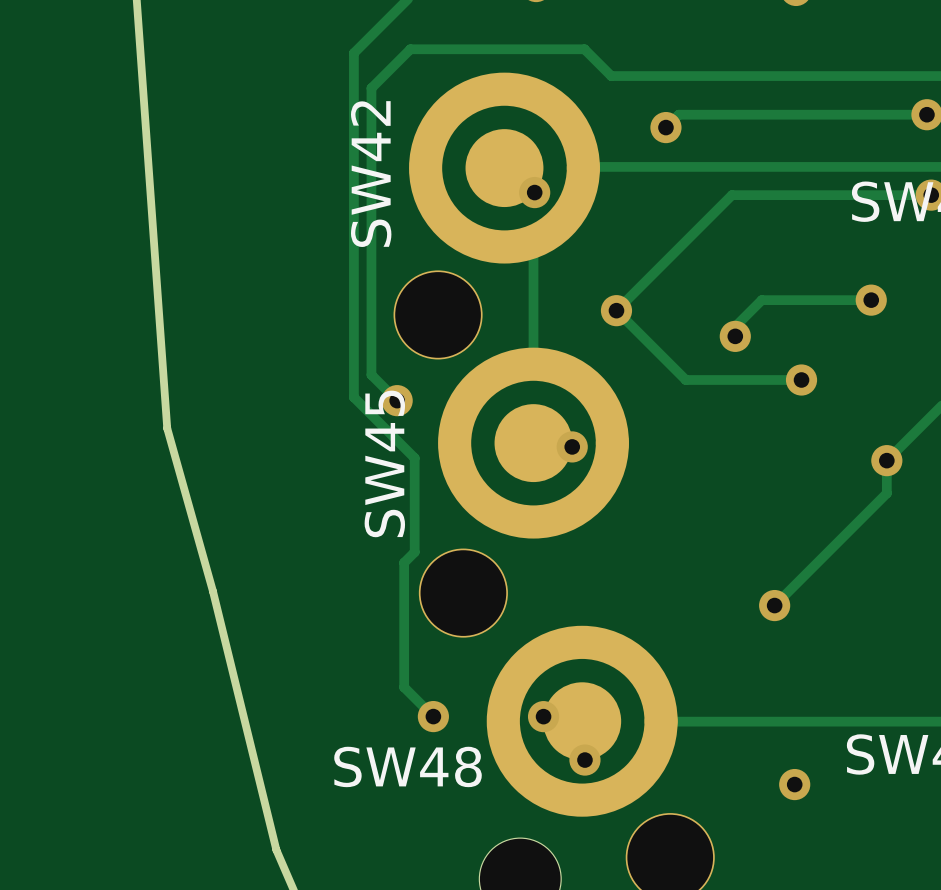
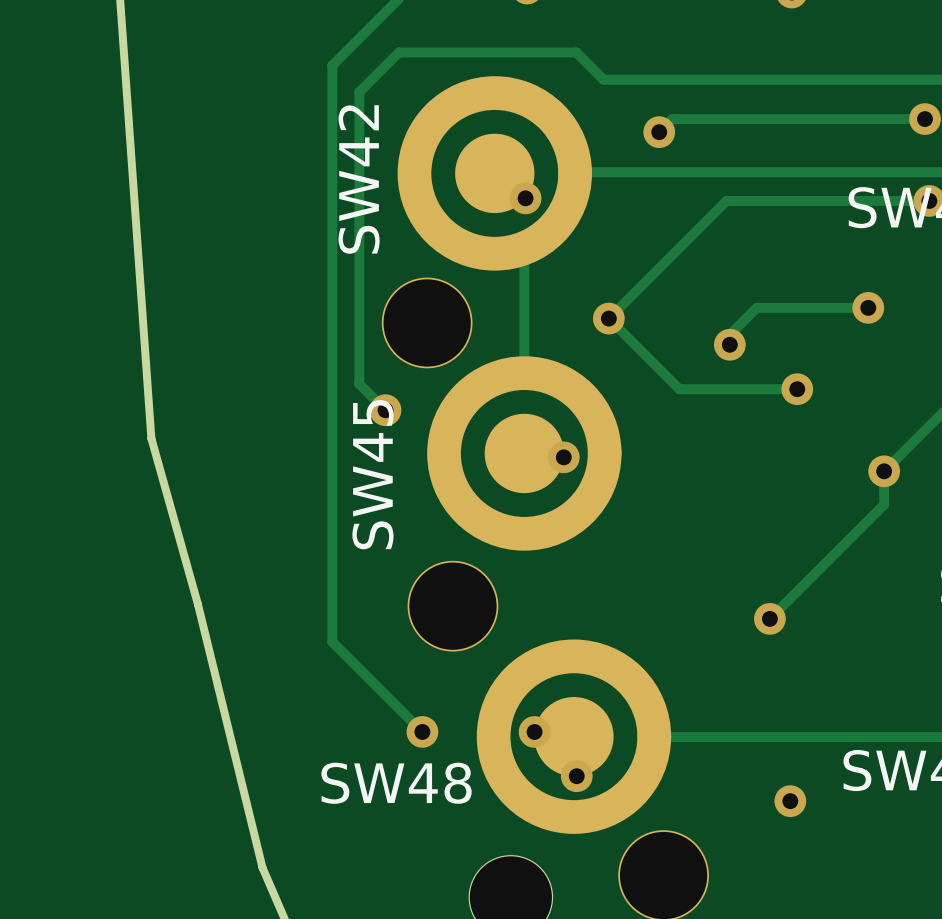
track: (353, 53) (353, 397) (414, 458) (414, 552) (404, 562) (404, 687) -> (341, 56) (332, 65) (332, 641) (392, 702)

